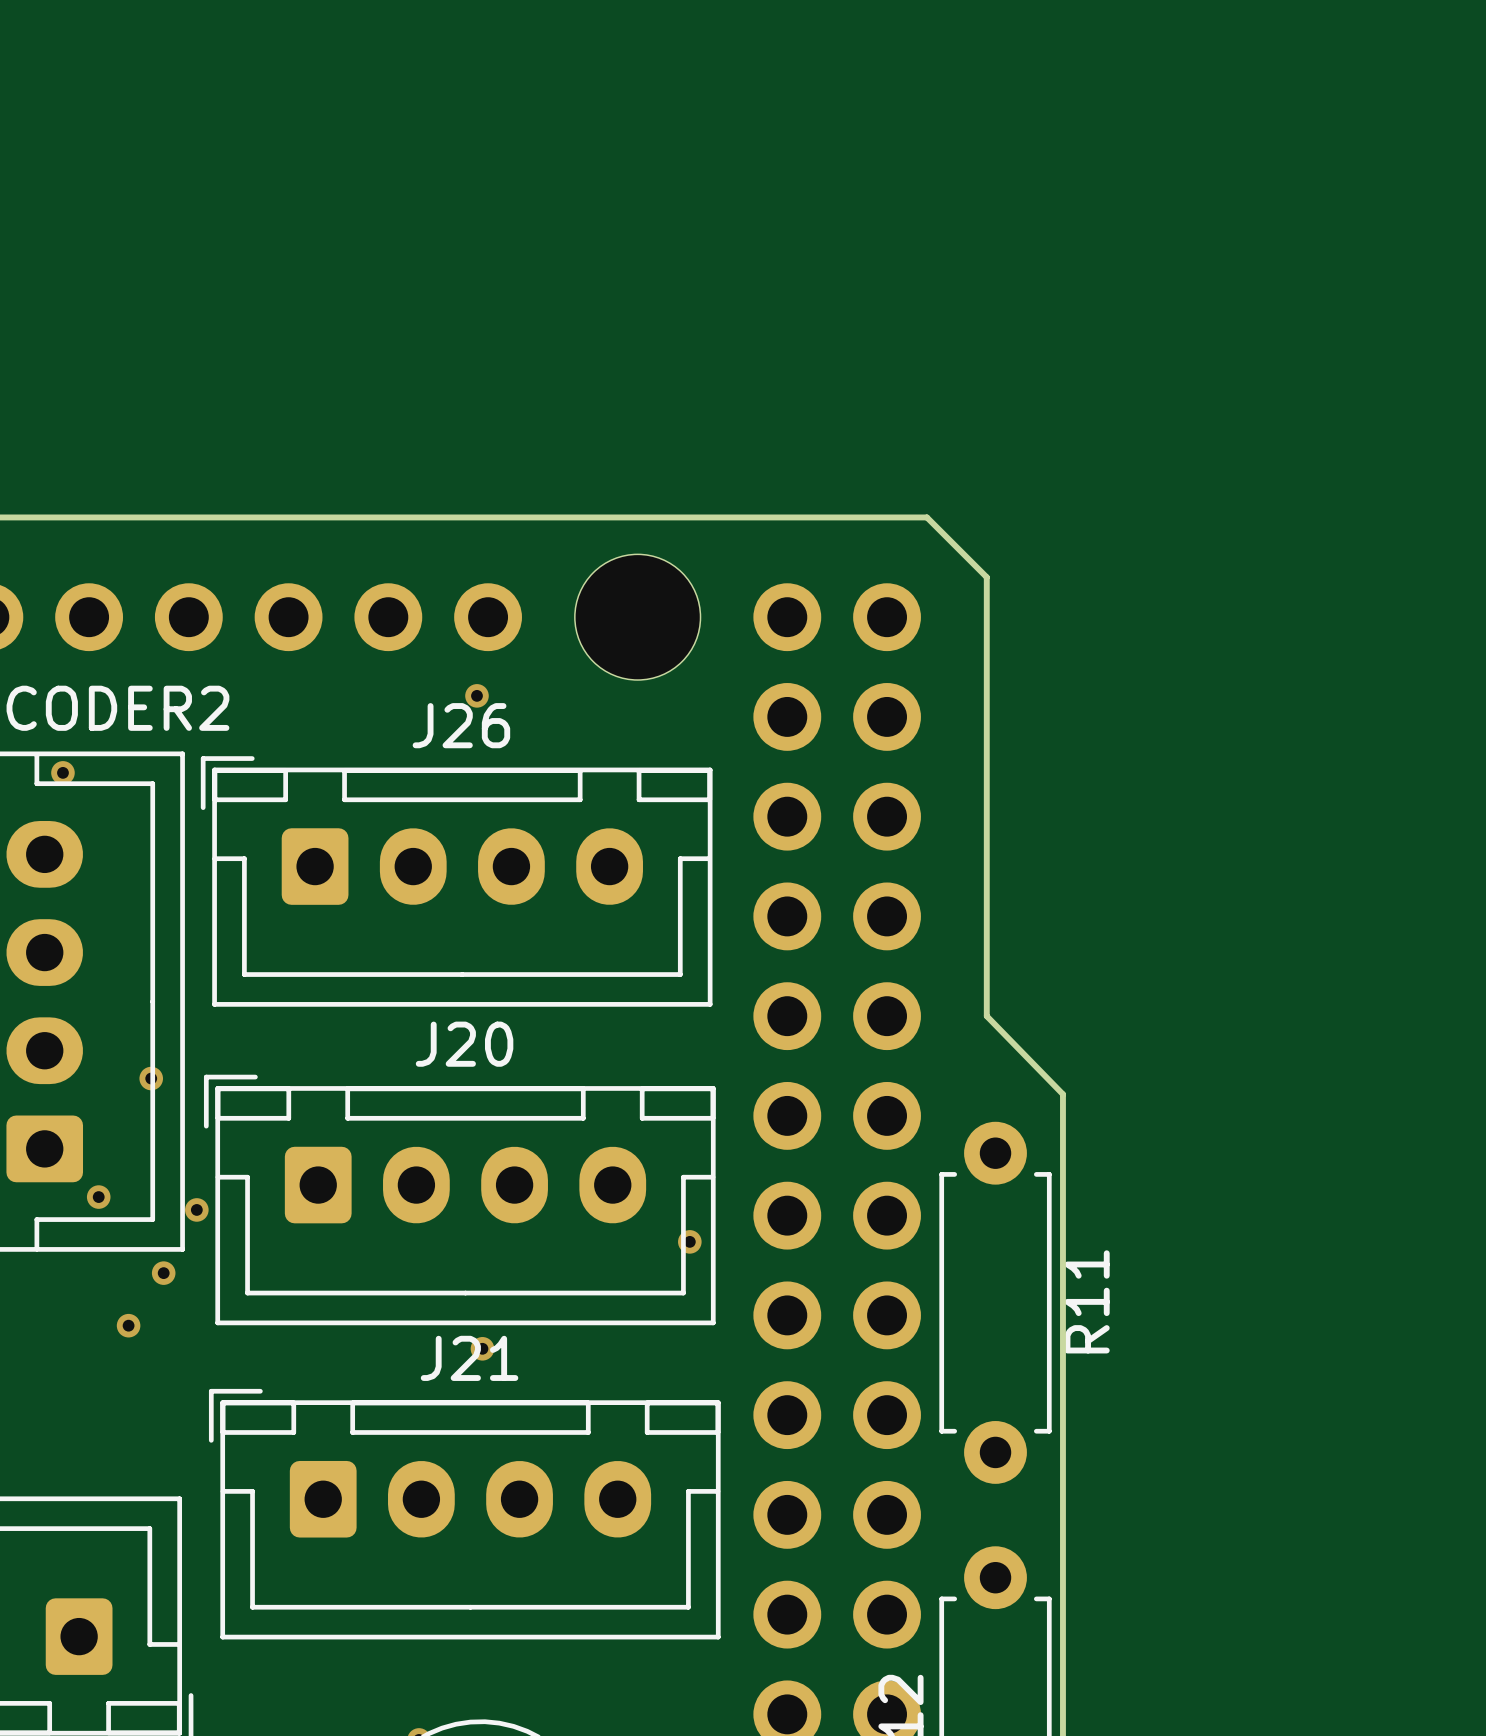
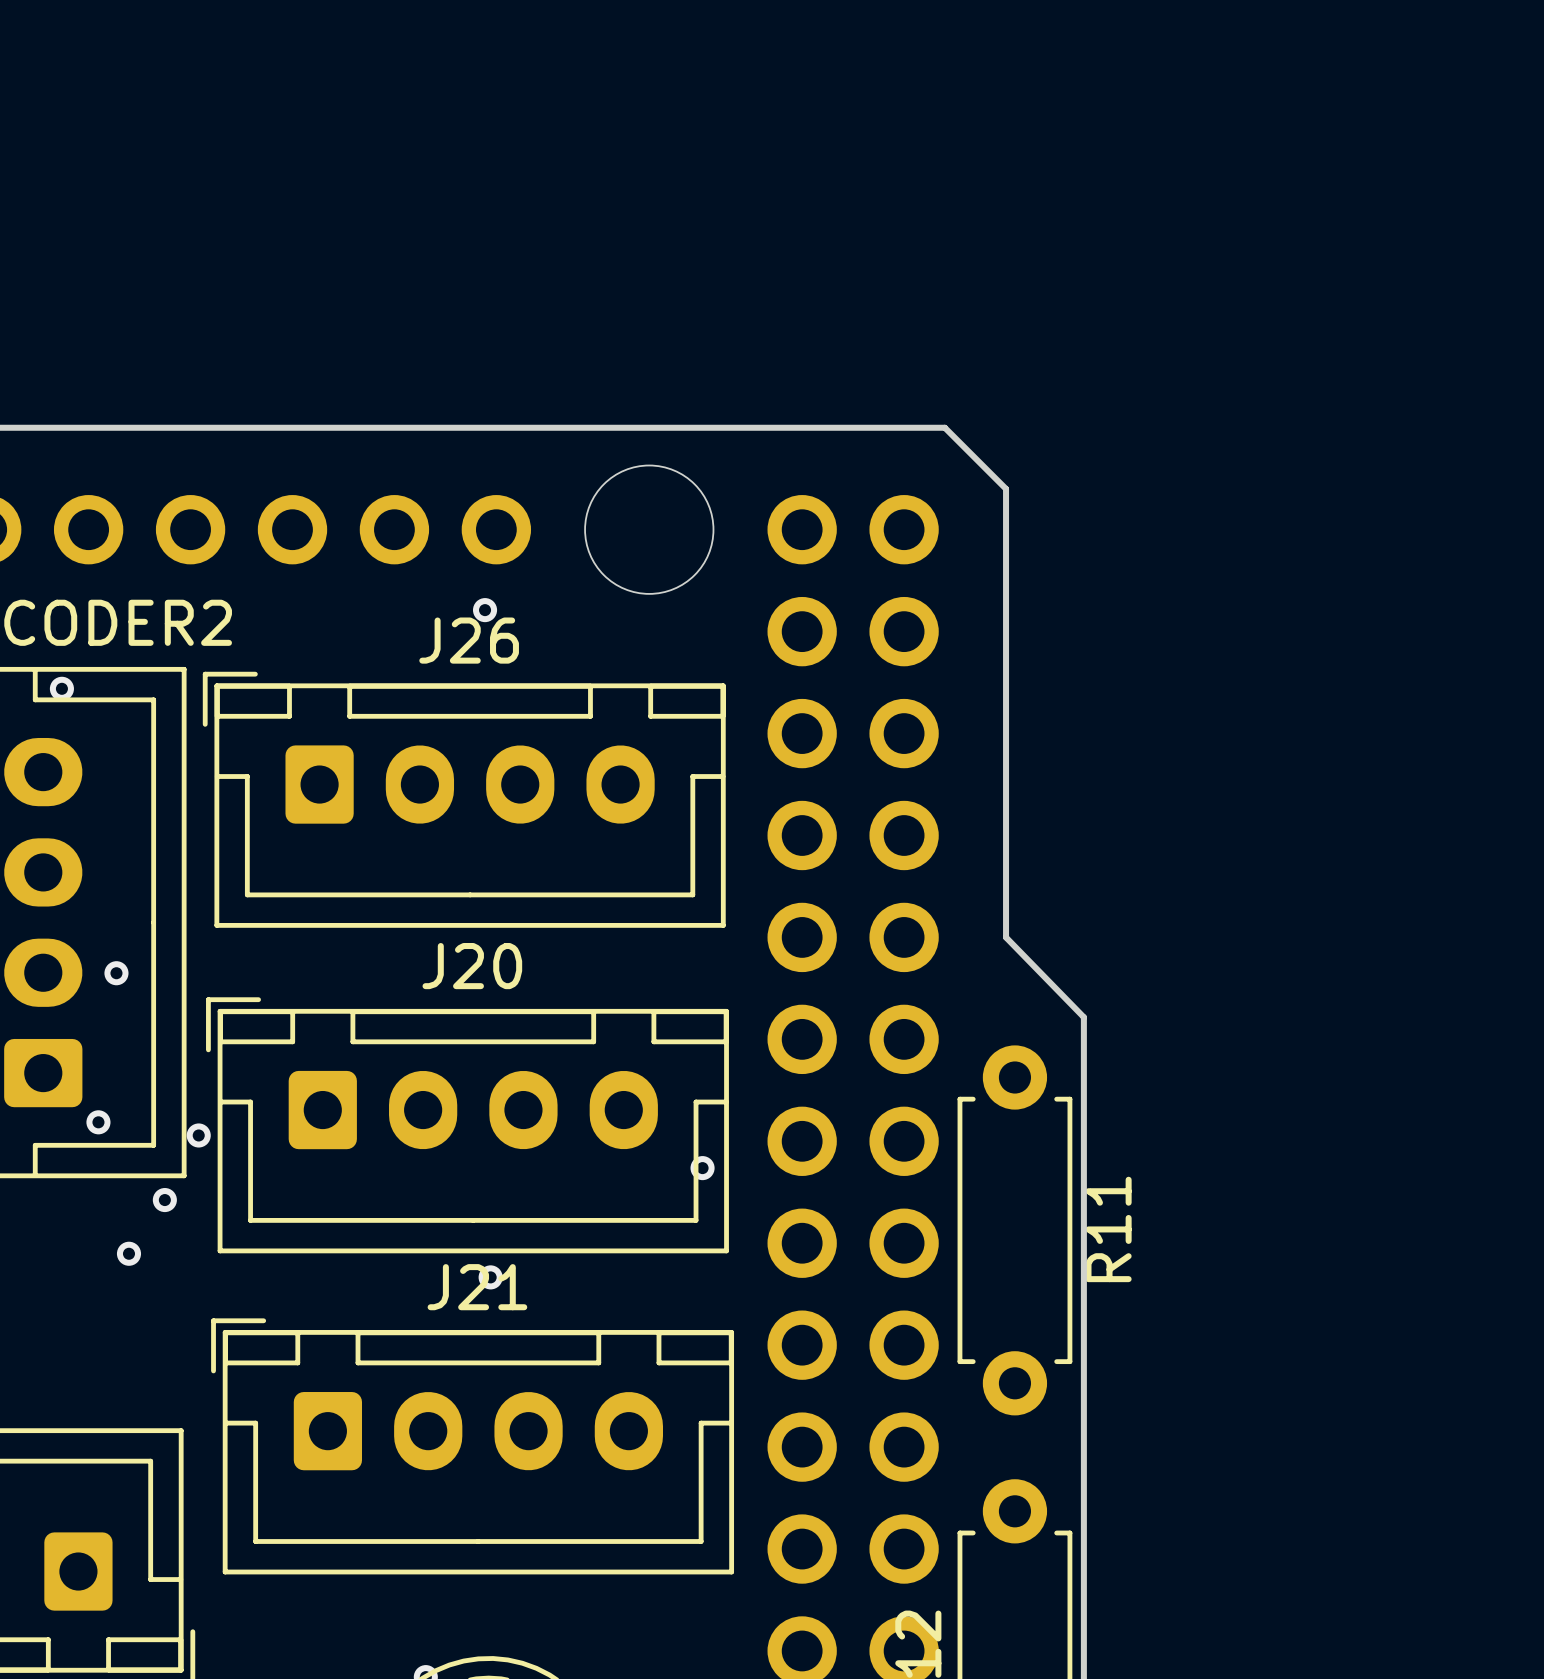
via position: (151, 1078) -> (116, 973)

